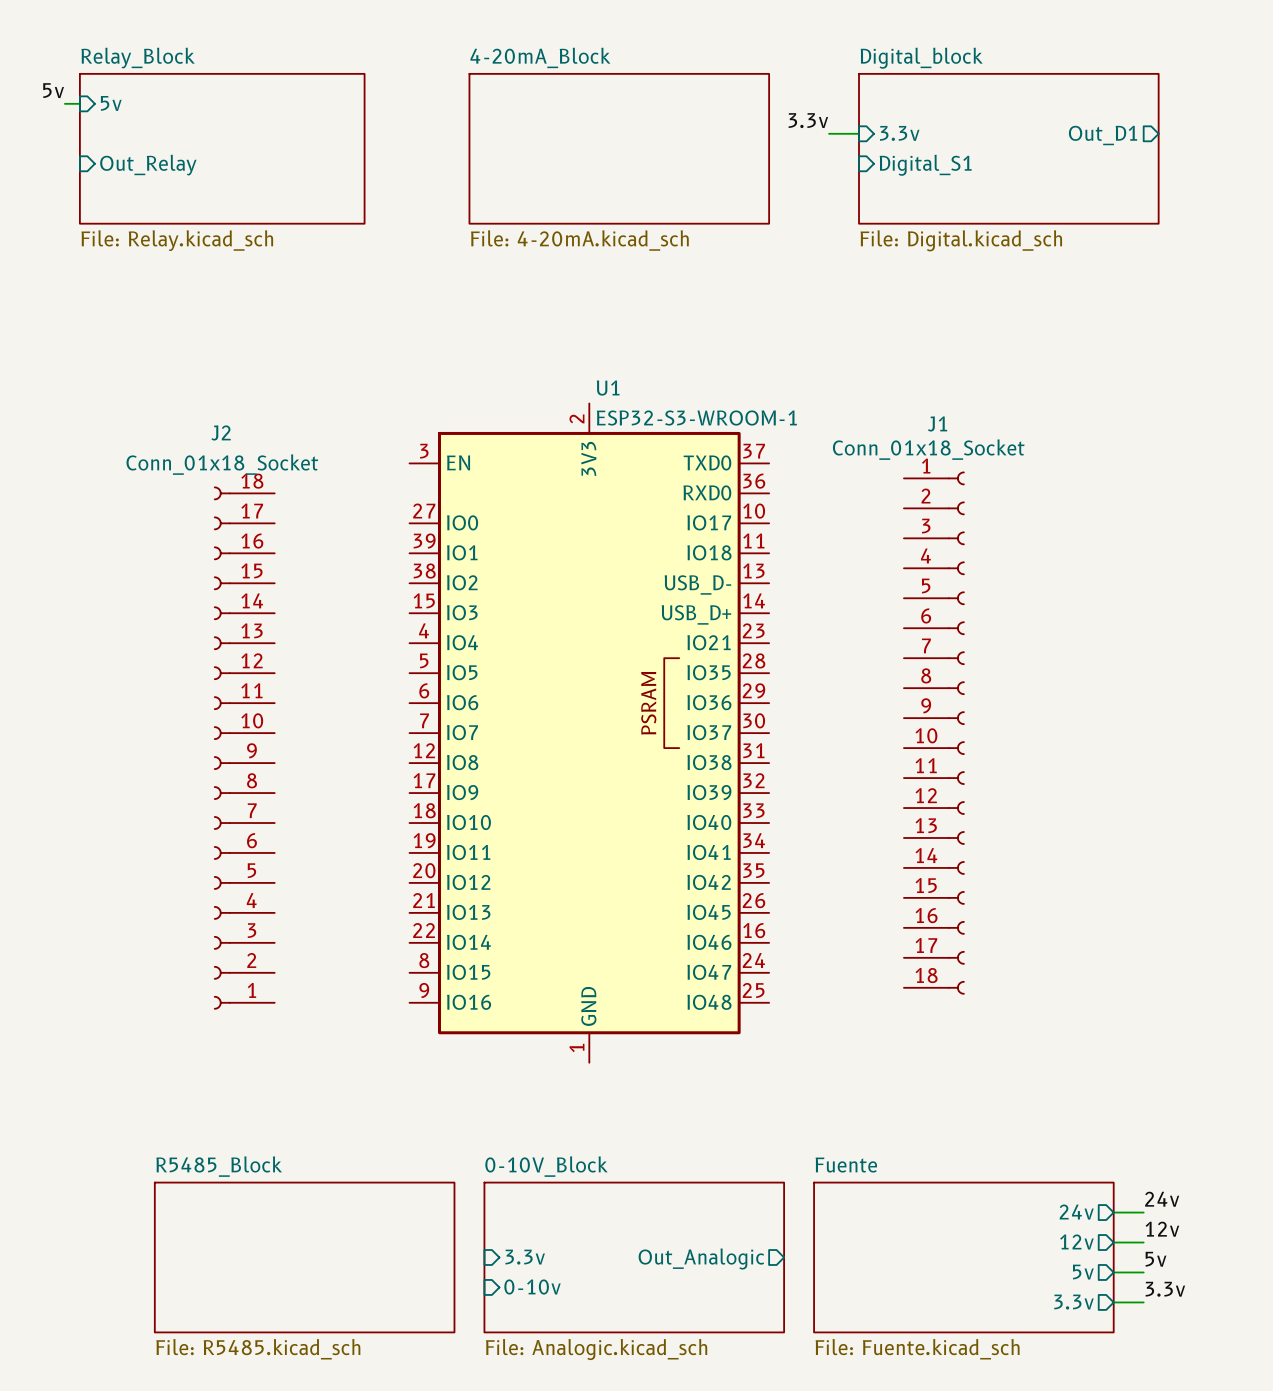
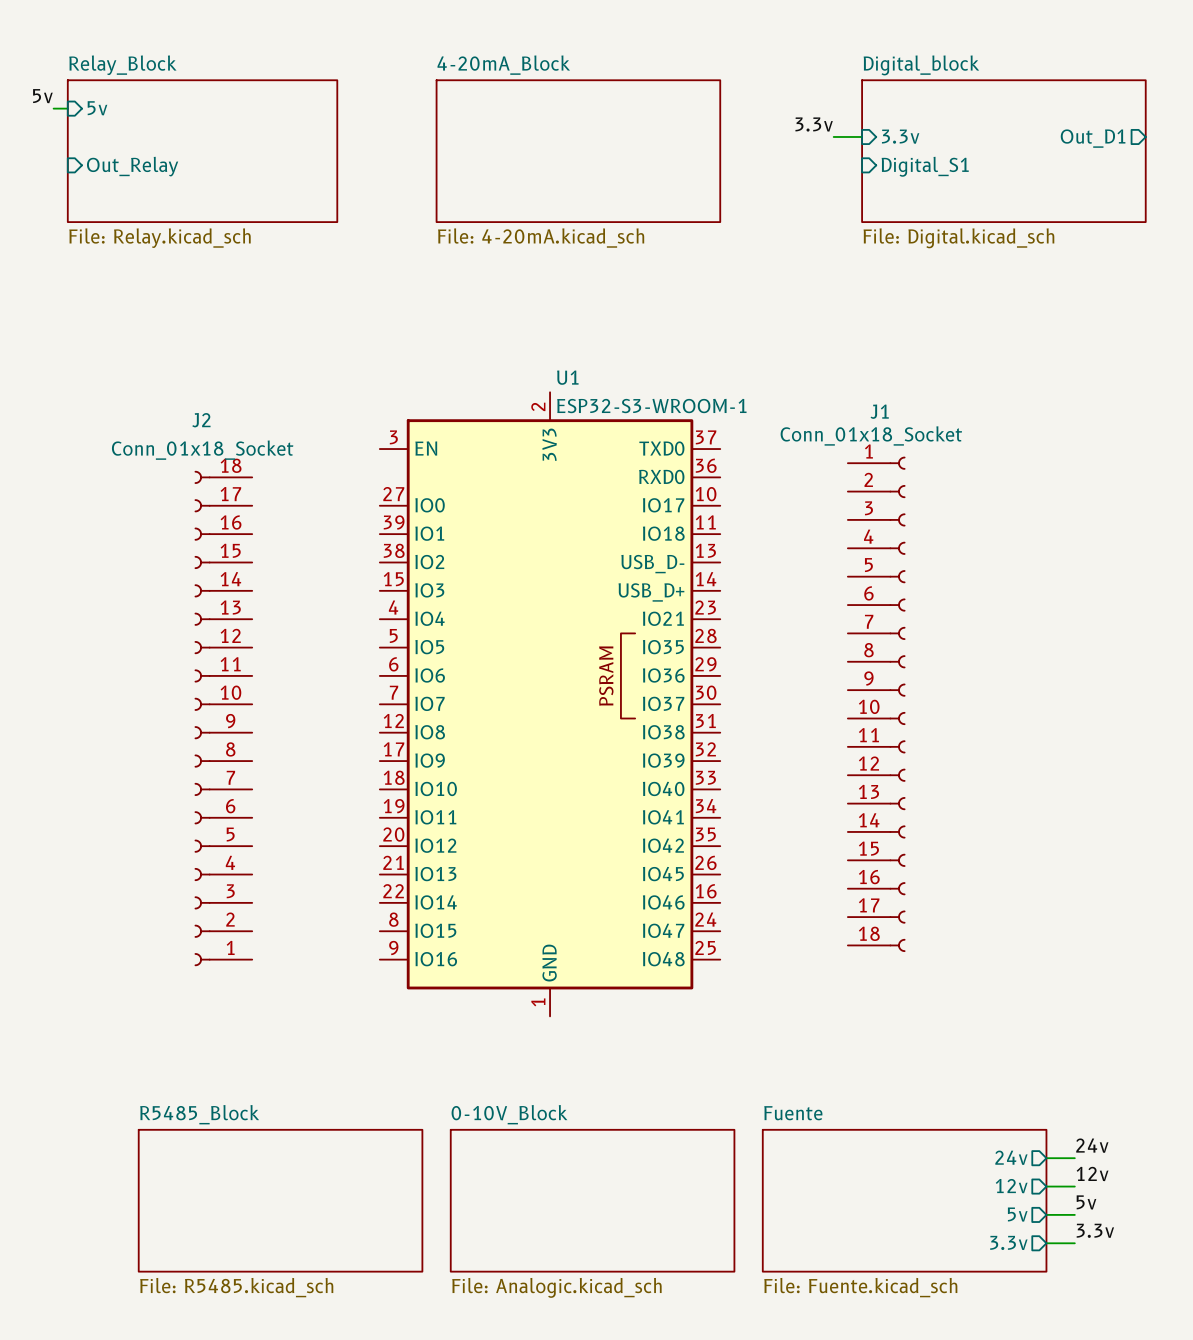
label position: 3.3v (808, 120) -> 3.3v (814, 124)
wire: (829, 133) (859, 133) -> (833, 136) (862, 136)
sheet pin position: 3.3v (899, 133) -> 3.3v (900, 136)
sheet pin position: Out_D1 (1103, 135) -> Out_D1 (1093, 138)
sheet Digital_block position: (1008, 148) -> (1003, 151)
sheet pin position: Digital_S1 (925, 165) -> Digital_S1 (925, 166)
sheet pin: 3.3v (525, 1257) -> none
sheet pin: Out_Analogic (701, 1258) -> none
sheet pin: 0-10v (532, 1287) -> none

